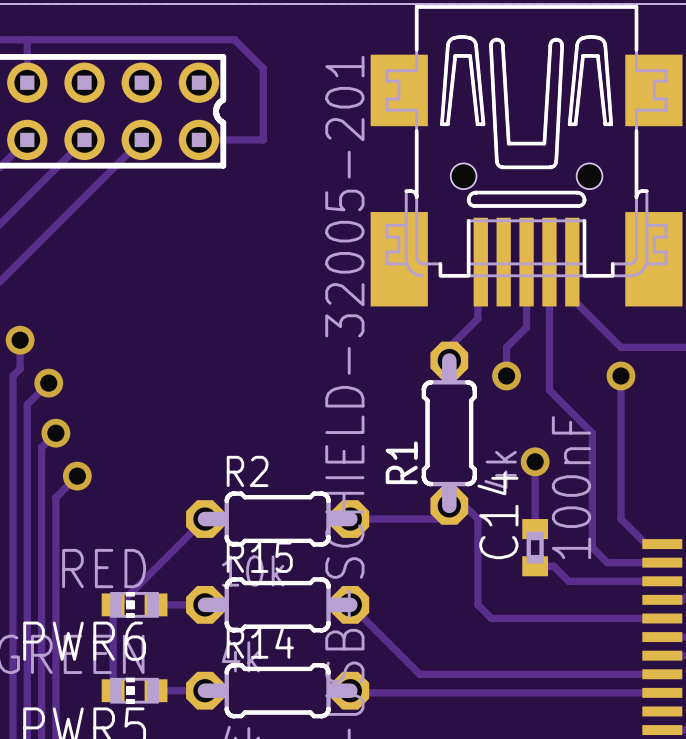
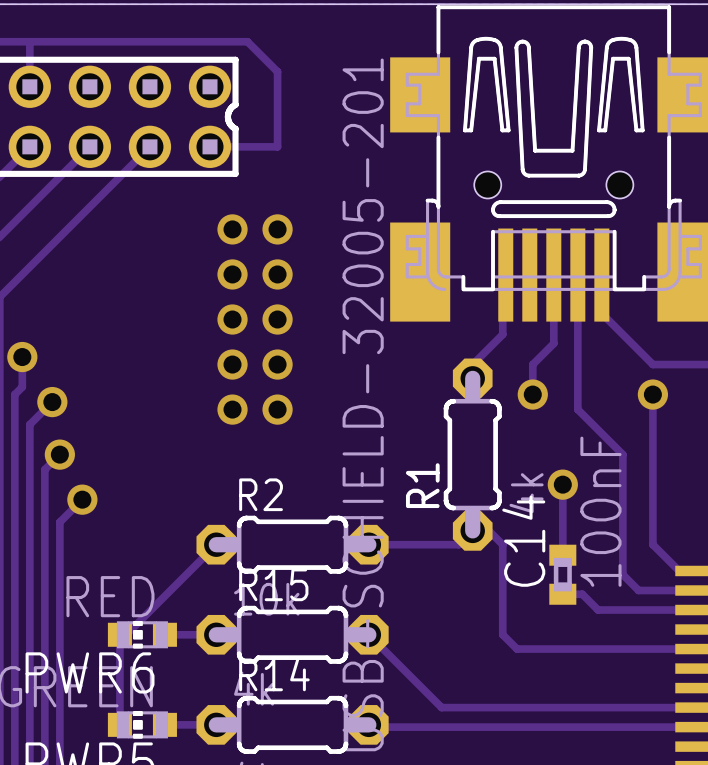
via: none -> (232, 229)
via: none -> (277, 229)
via: none -> (232, 274)
via: none -> (277, 274)
via: none -> (232, 319)
via: none -> (277, 319)
via: none -> (232, 364)
via: none -> (277, 364)
via: none -> (232, 409)
via: none -> (277, 409)

